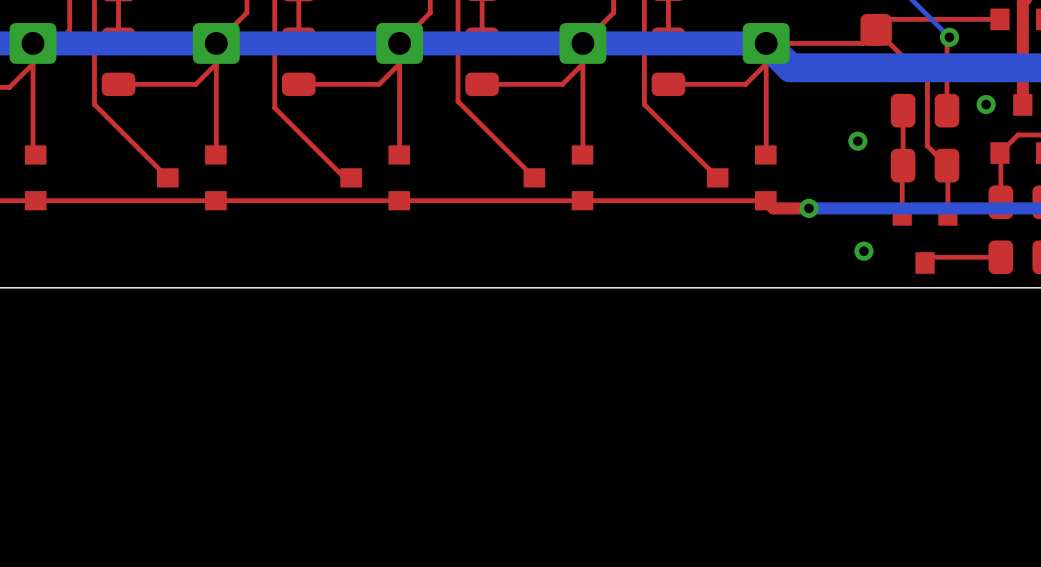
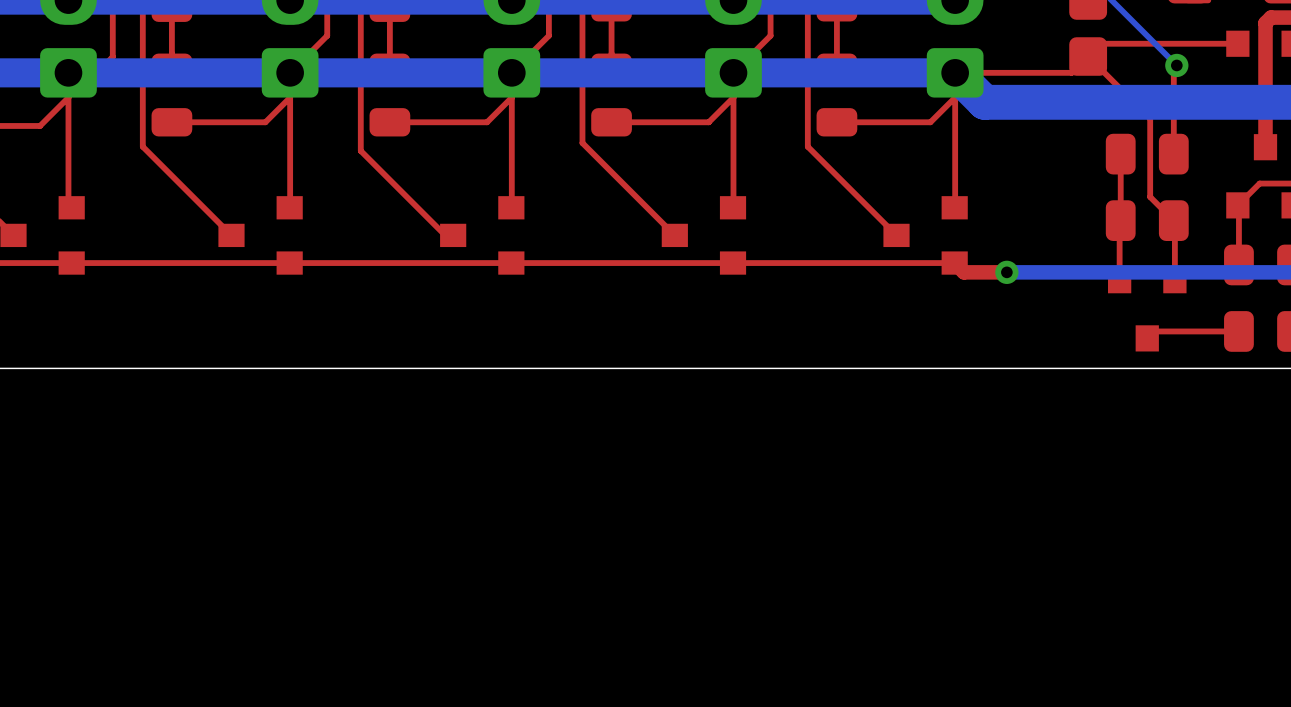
via: (986, 104) -> none
via: (857, 141) -> none
via: (863, 251) -> none

